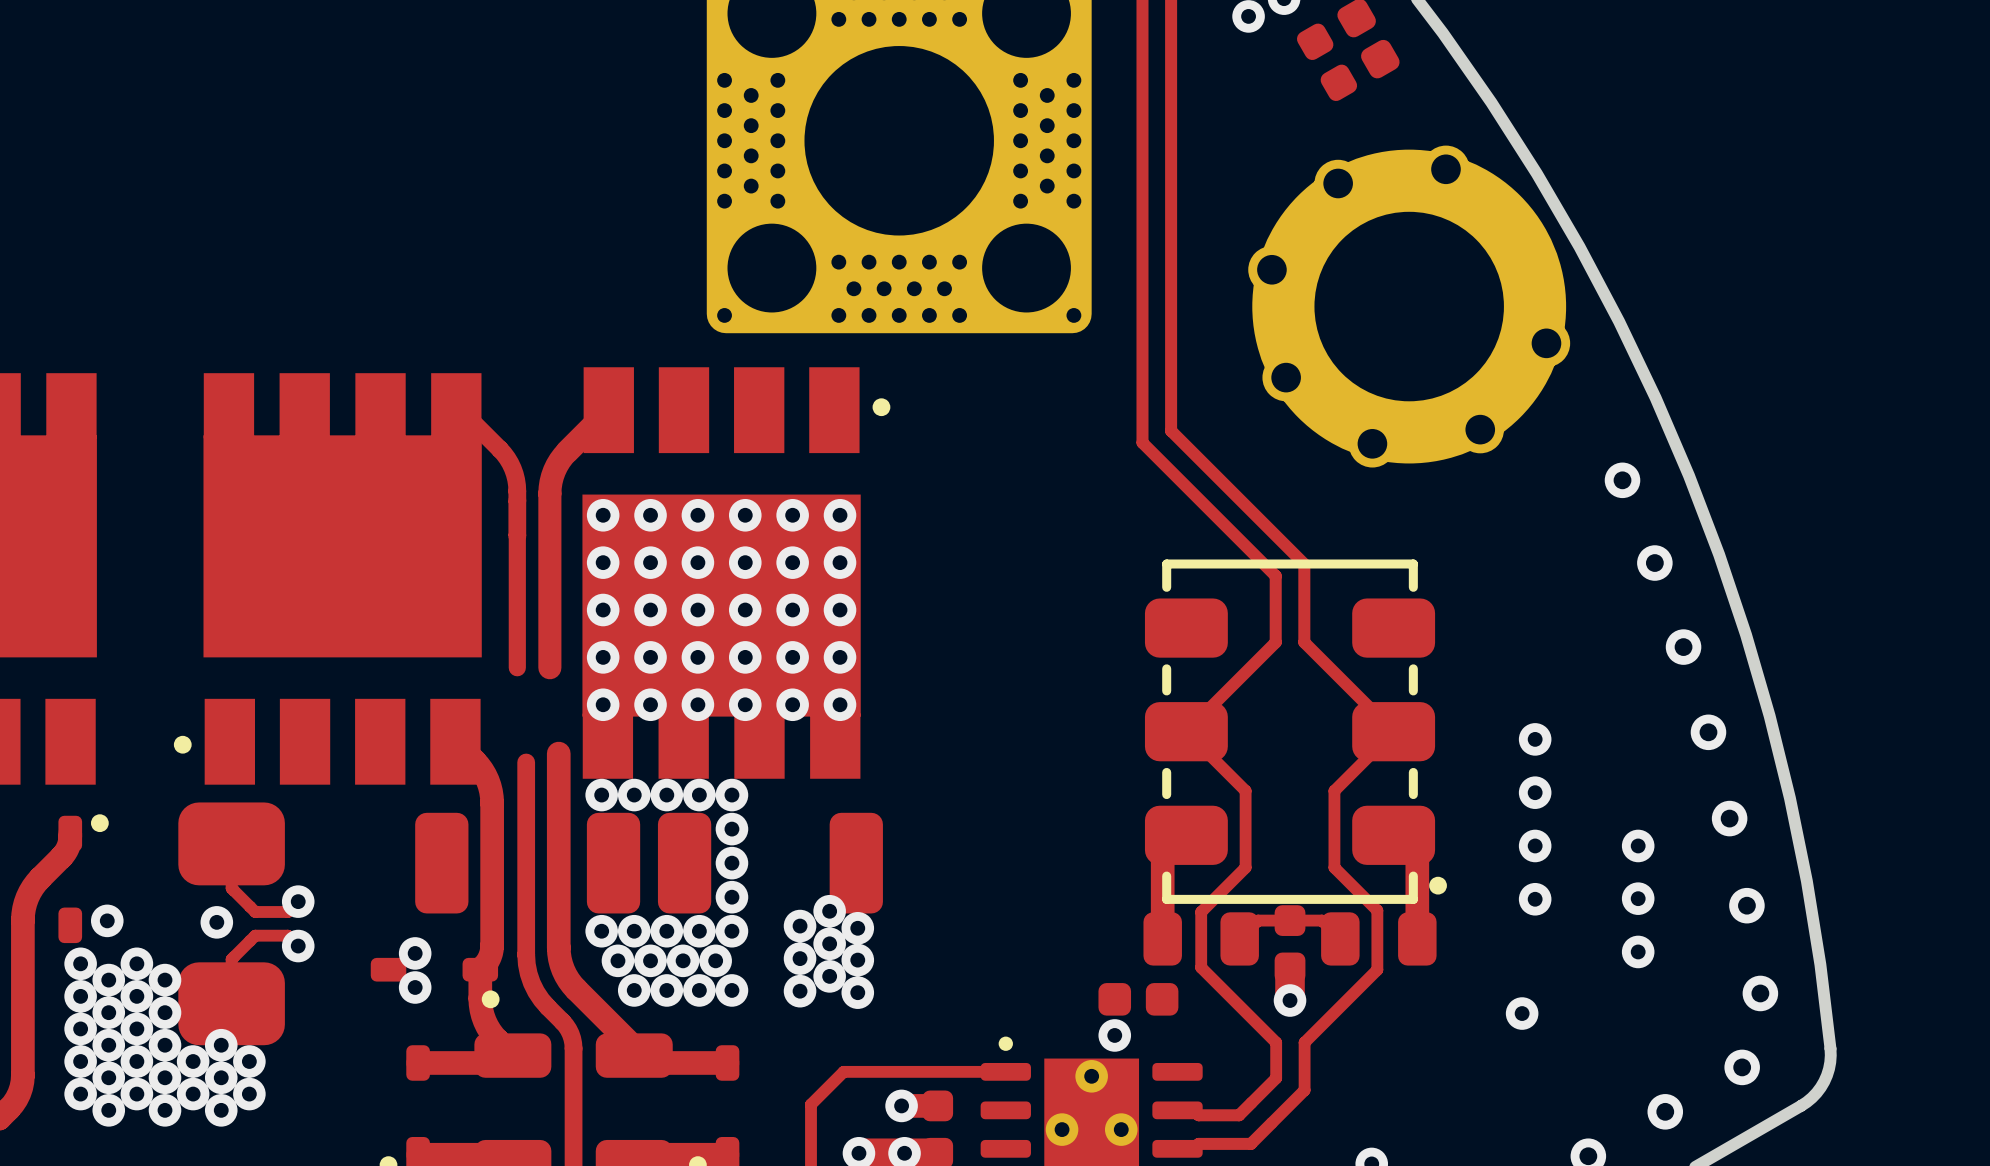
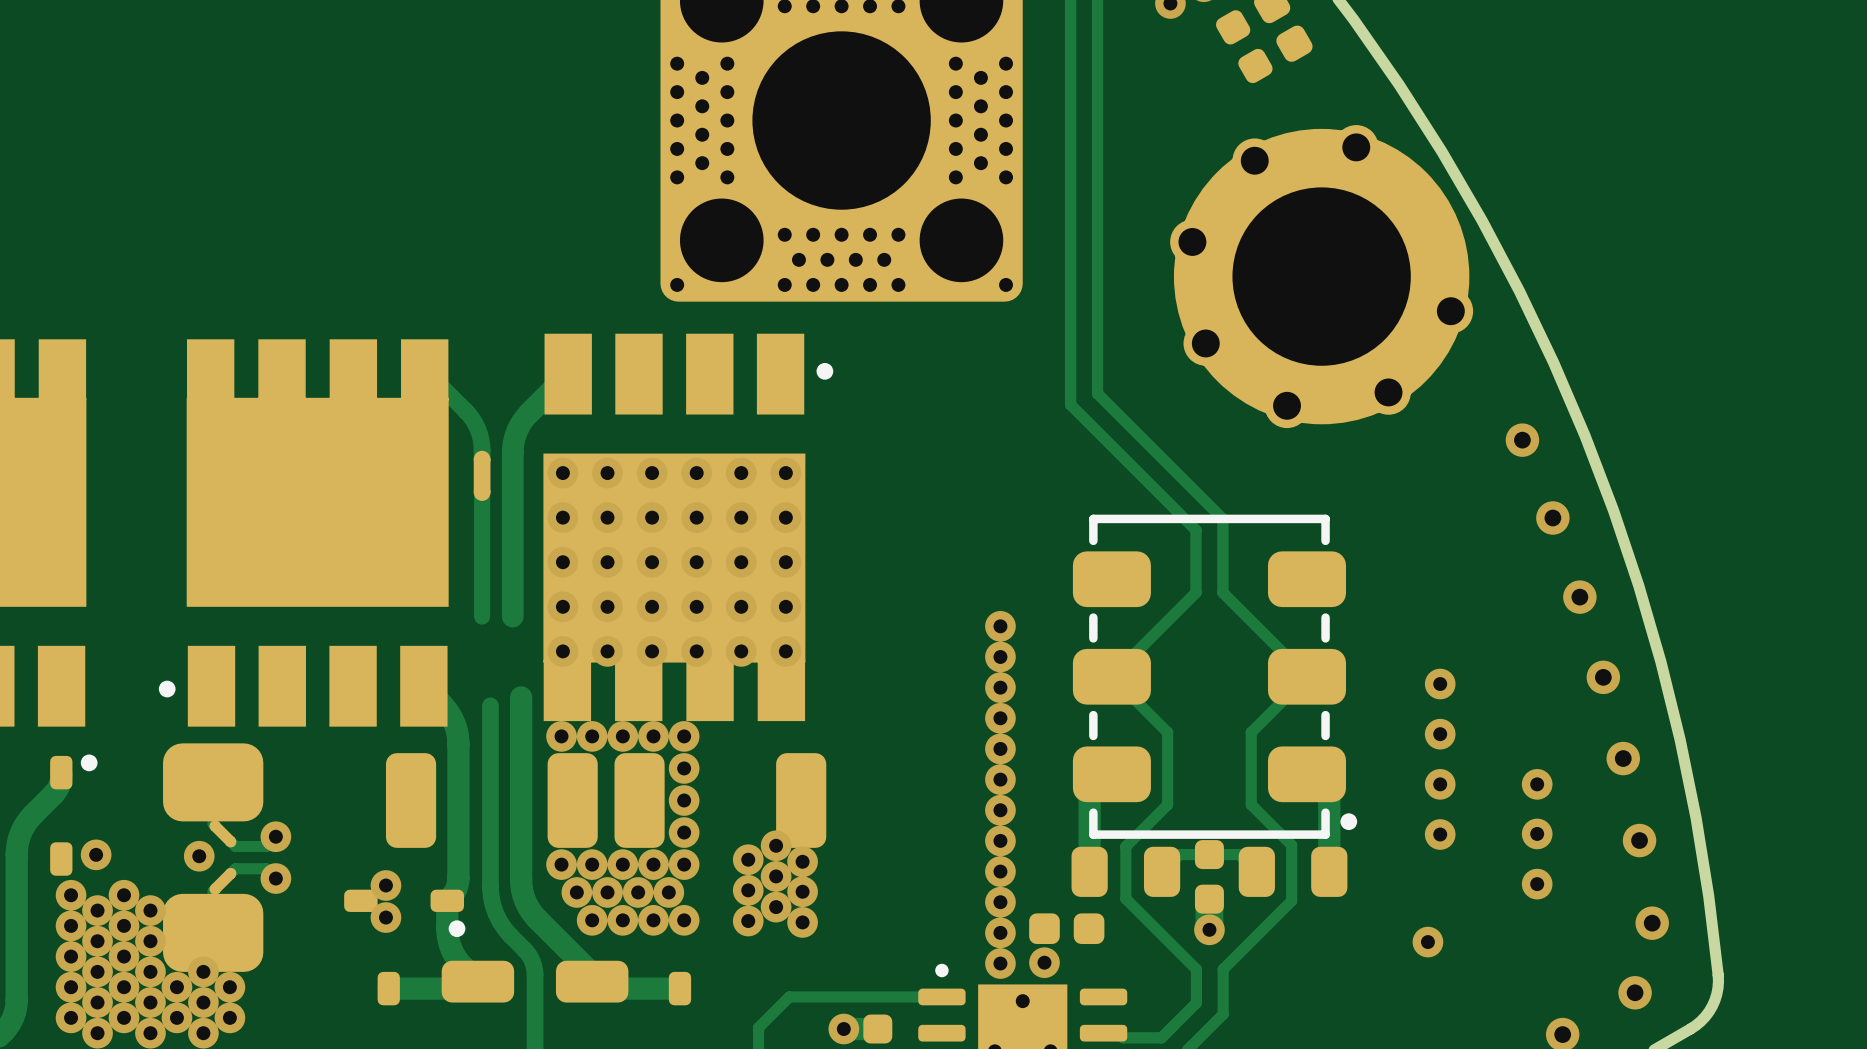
via: none -> (1000, 626)
via: none -> (1000, 656)
via: none -> (1000, 687)
via: none -> (1000, 718)
via: none -> (1000, 748)
via: none -> (1000, 779)
via: none -> (1000, 810)
via: none -> (1000, 840)
via: none -> (1000, 871)
via: none -> (1000, 902)
via: none -> (1000, 932)
via: none -> (1000, 963)

